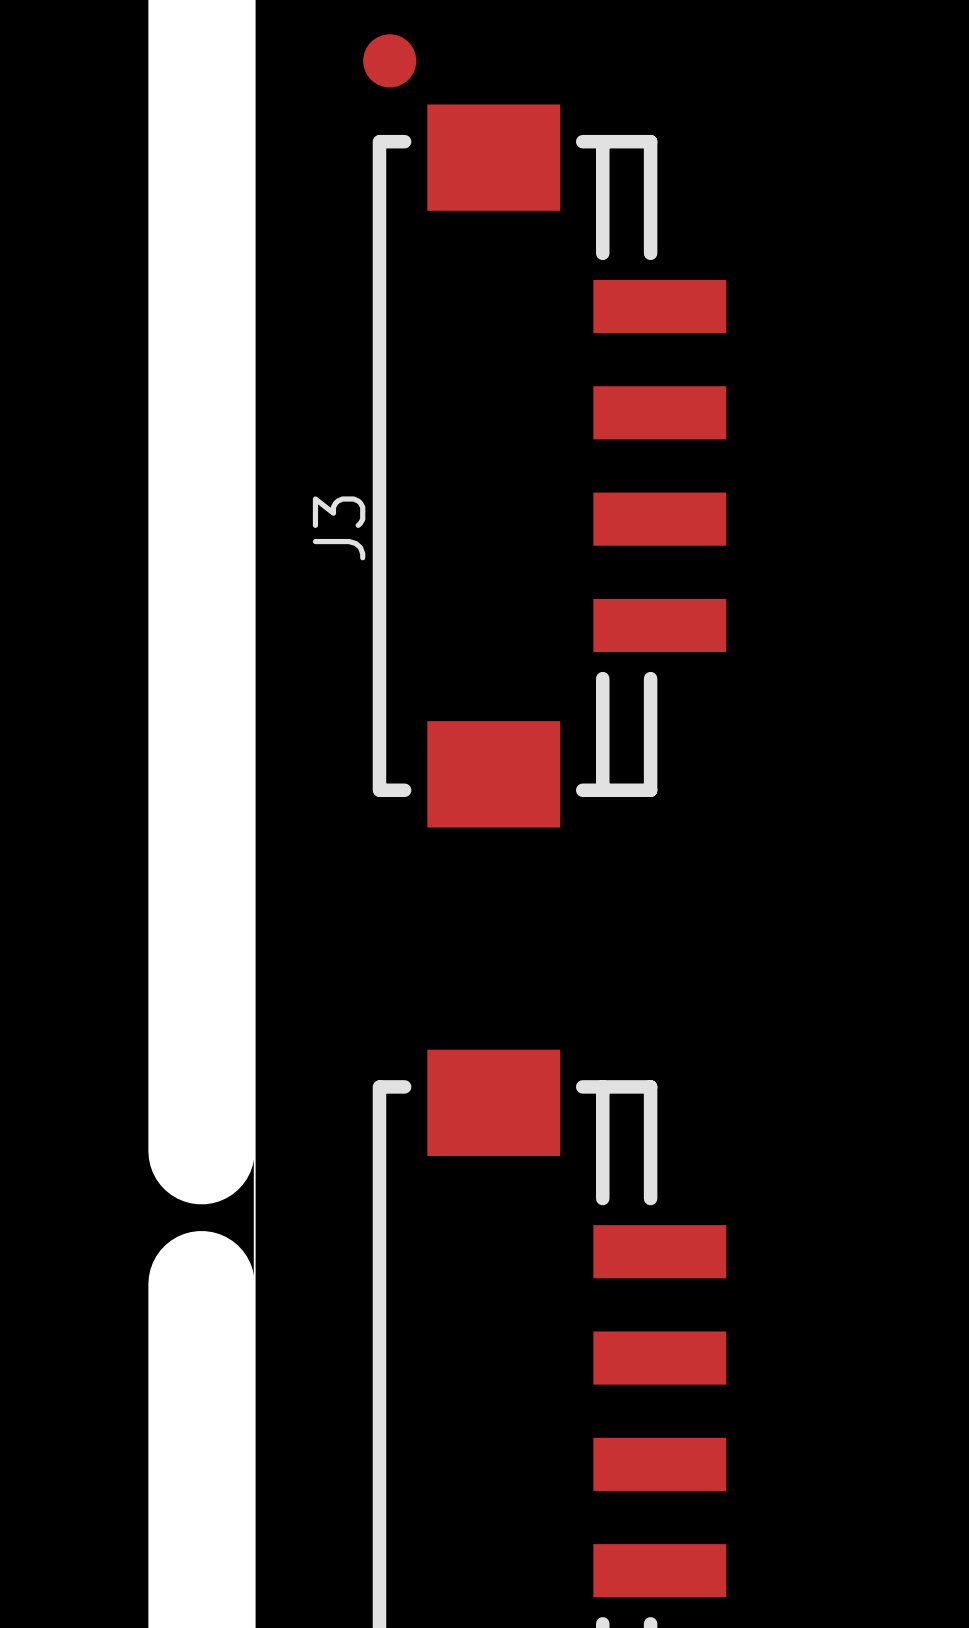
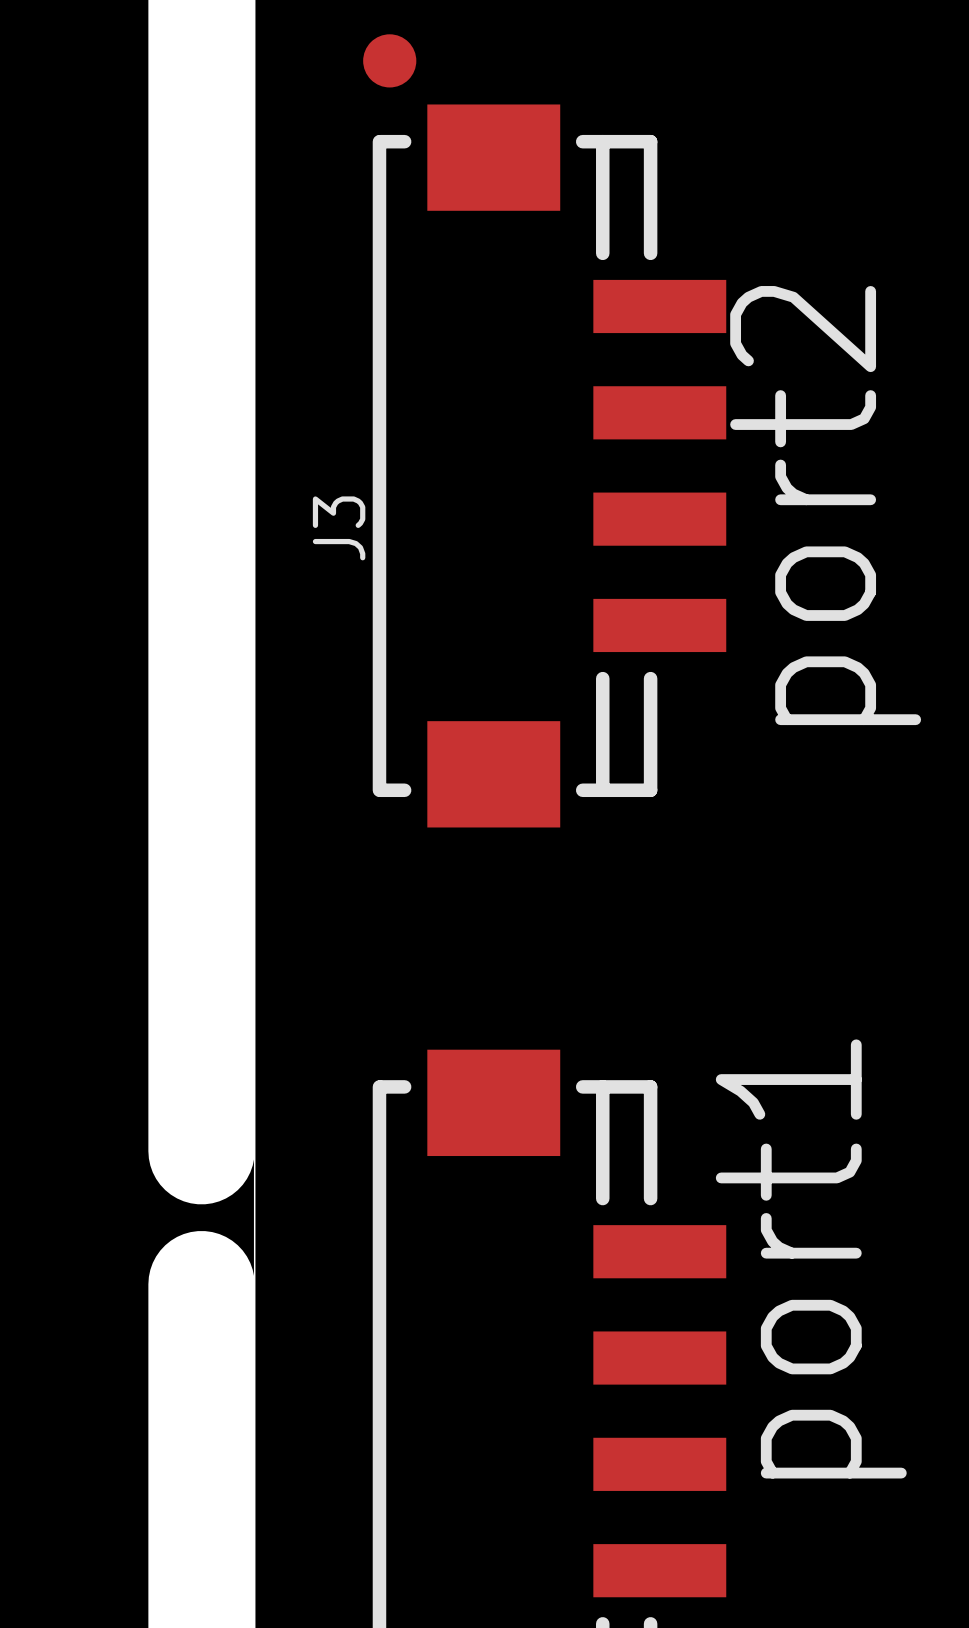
text: none -> port2 (825, 505)
text: none -> port1 (811, 1258)

